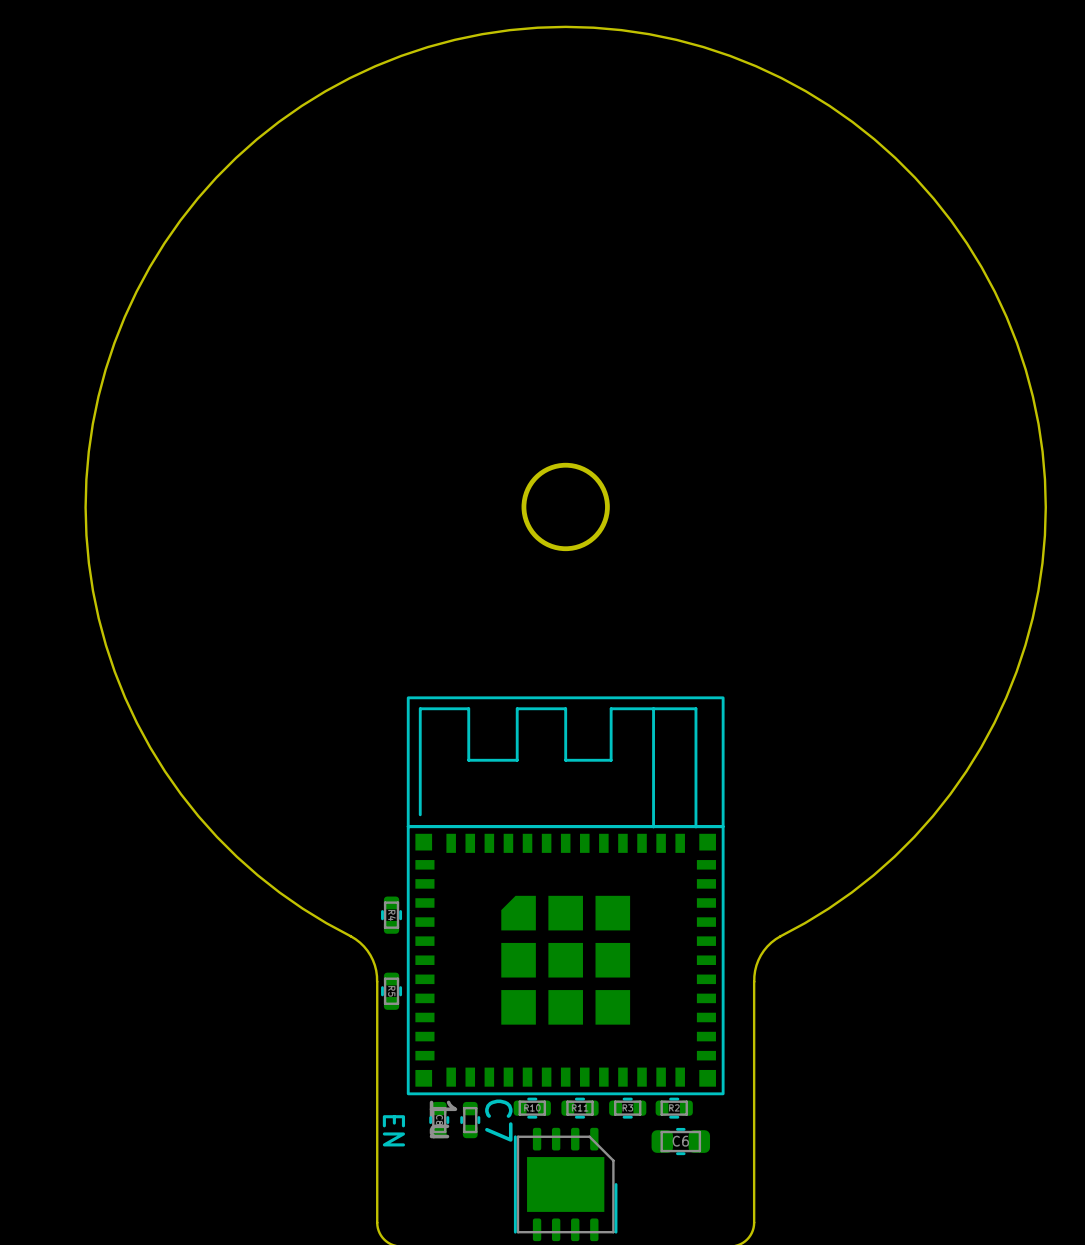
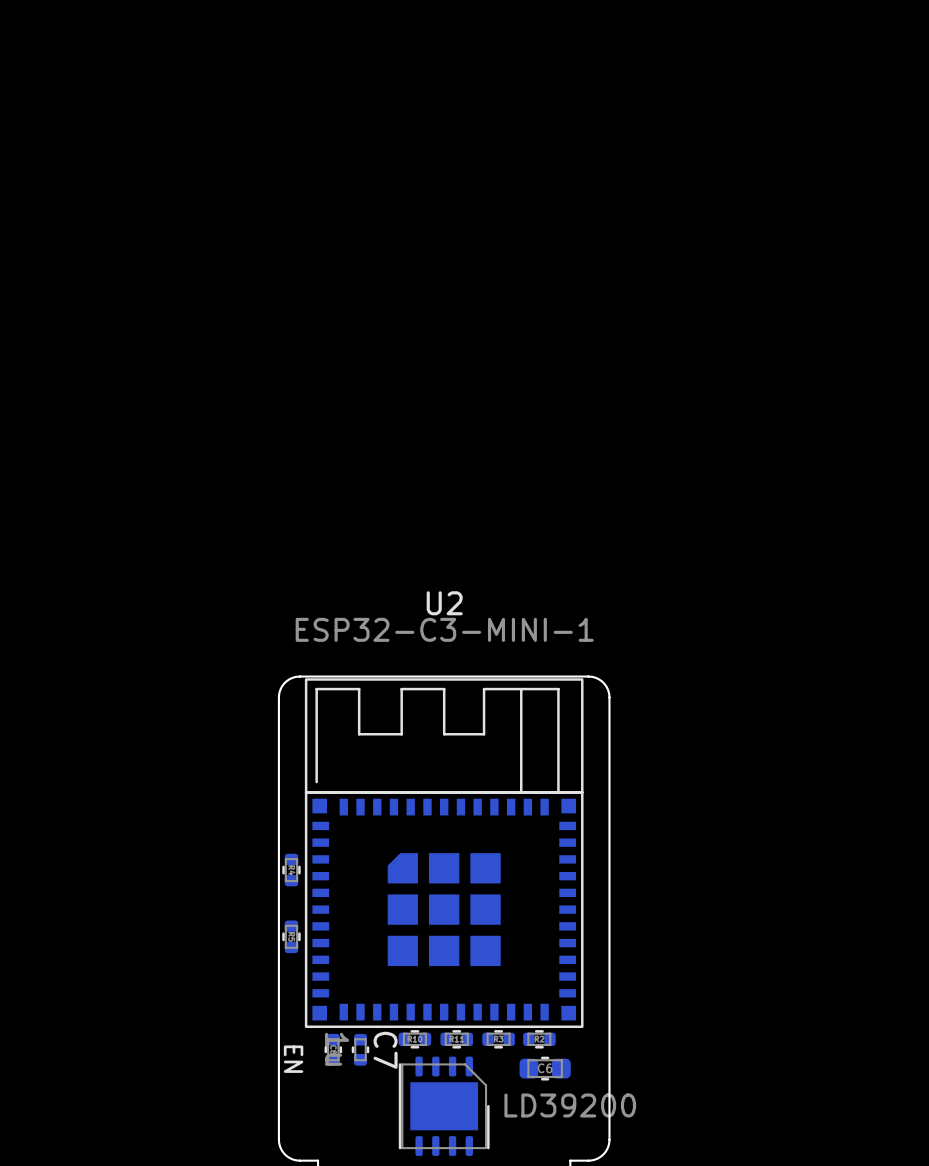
round board edge: [521, 462, 610, 552] -> none
U2 name: none -> U2 (444, 603)
U2 value: none -> ESP32-C3-MINI-1 (444, 629)
board edge: (754, 981) (758, 960) (771, 942) (851, 892) (873, 875) (914, 836) (950, 794) (981, 747) (994, 723) (1016, 671) (1025, 645) (1032, 618) (1042, 563) (1045, 507) (1042, 451) (1038, 424) (1025, 369) (1016, 343) (994, 291) (981, 267) (950, 220) (933, 198) (895, 157) (874, 139) (852, 122) (805, 91) (781, 78) (729, 55) (676, 39) (649, 34) (593, 27) (565, 26) (537, 27) (482, 34) (454, 39) (401, 55) (350, 78) (325, 91) (301, 105) (256, 139) (216, 177) (197, 198) (164, 243) (149, 267) (136, 291) (114, 343) (105, 369) (92, 424) (86, 479) (85, 507) (86, 535) (92, 590) (98, 618) (114, 671) (136, 723) (150, 747) (181, 794) (216, 836) (257, 875) (279, 892) (360, 942) (372, 960) (377, 981) -> (609, 928) (609, 695) (606, 686) (601, 681) (588, 676) (299, 676) (286, 681) (280, 688) (278, 697) (278, 928)
part value: none -> LD39200 (570, 1105)

